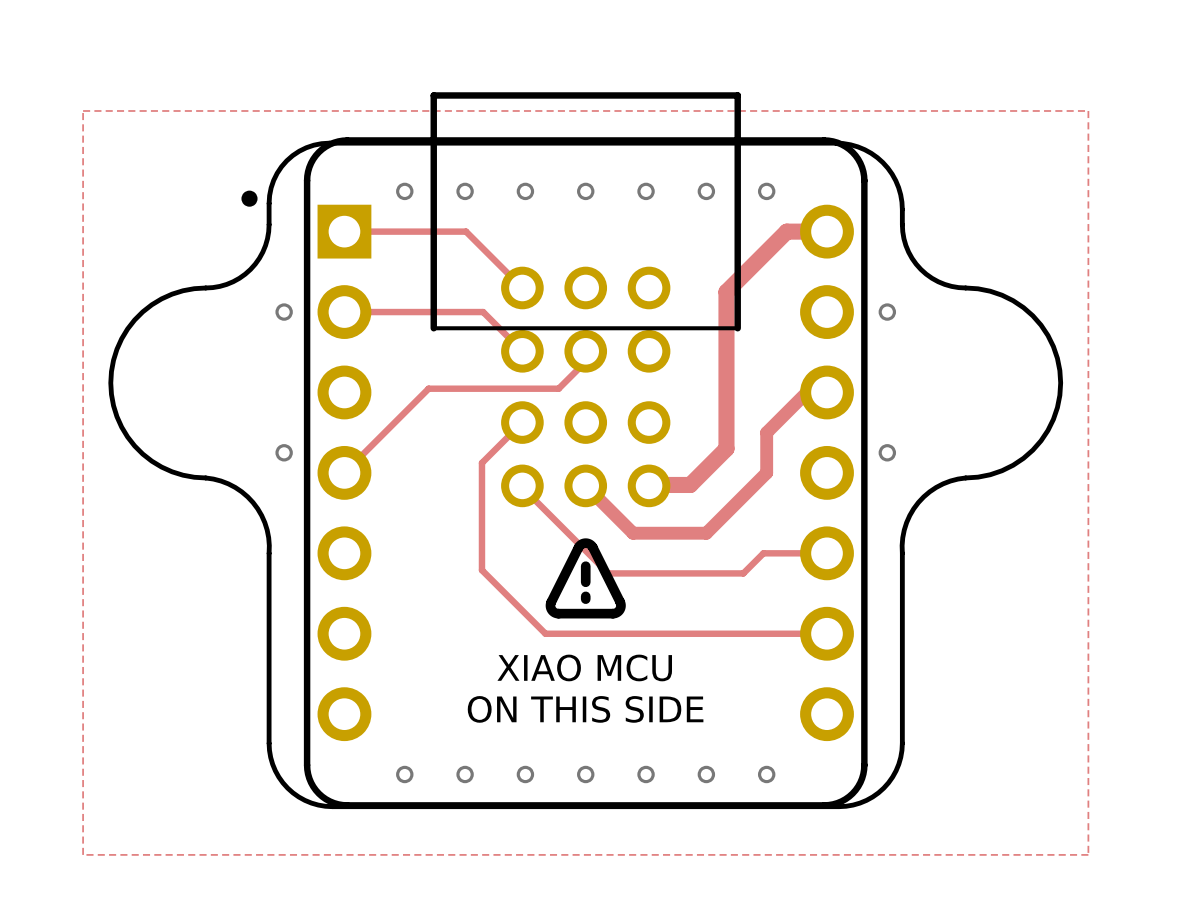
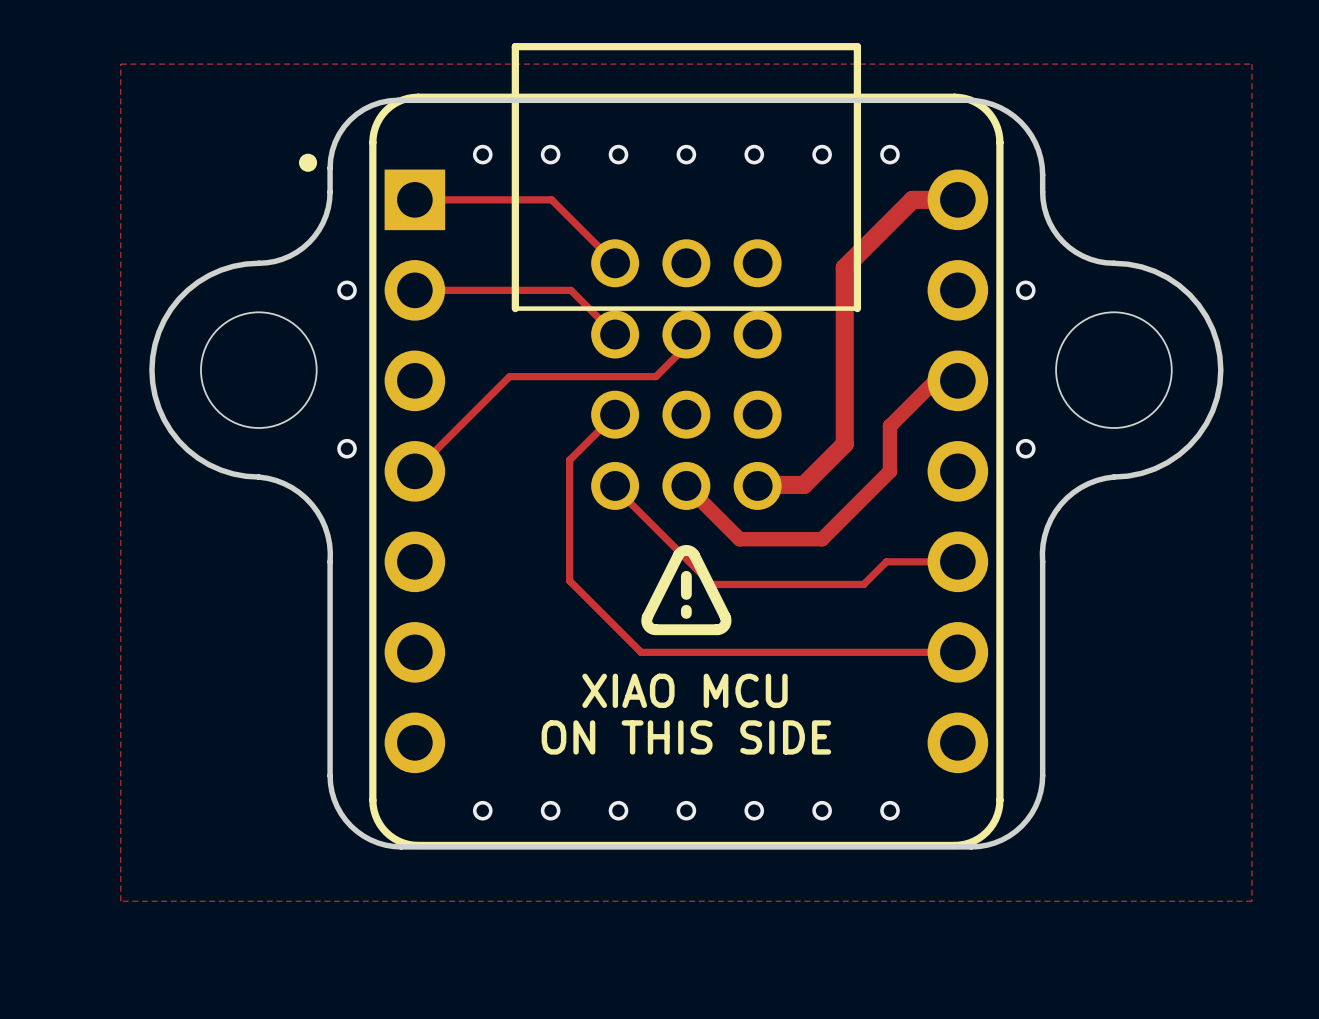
round board edge: none -> [200, 311, 318, 429]
round board edge: none -> [1055, 311, 1173, 429]

